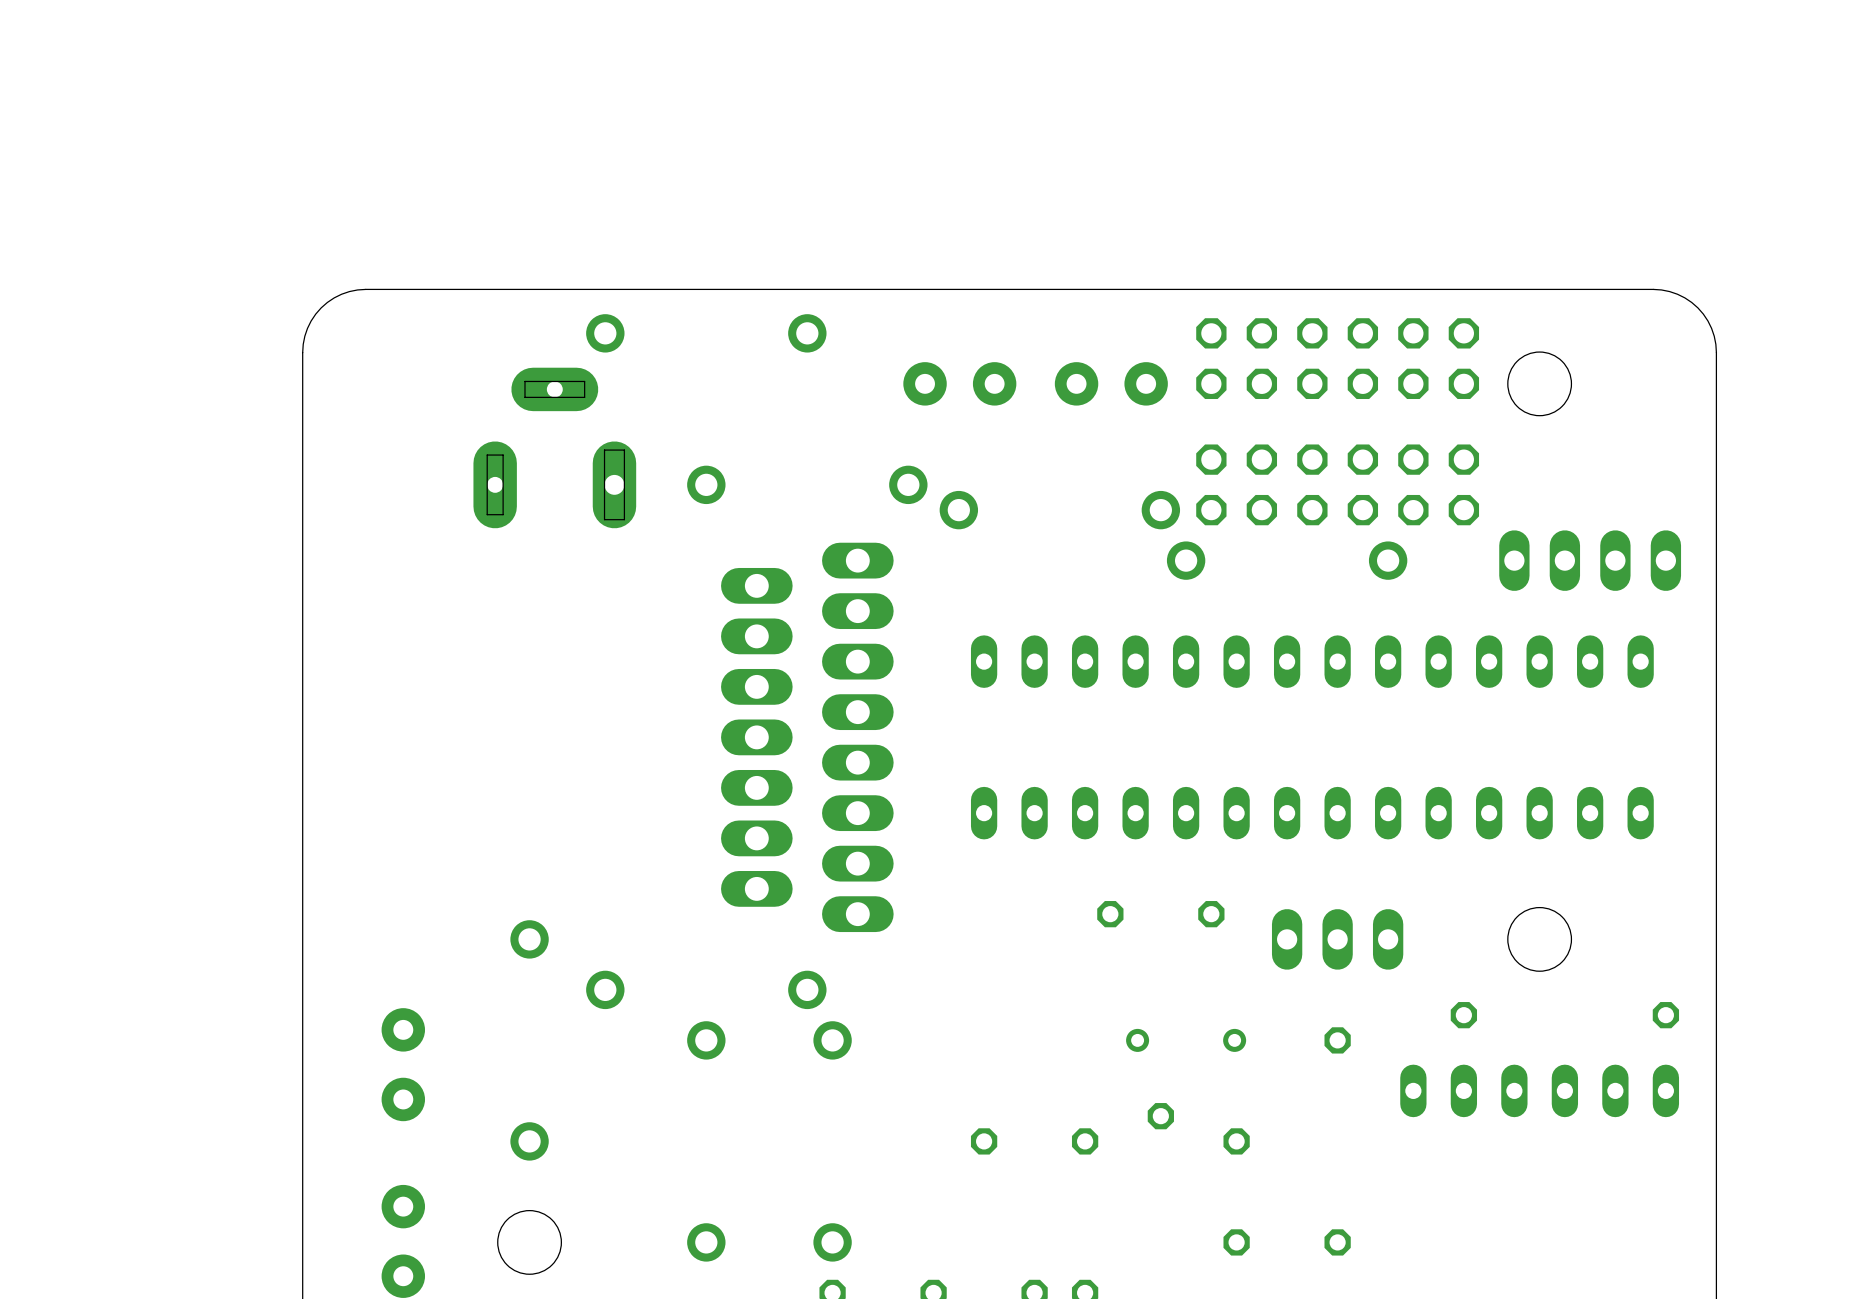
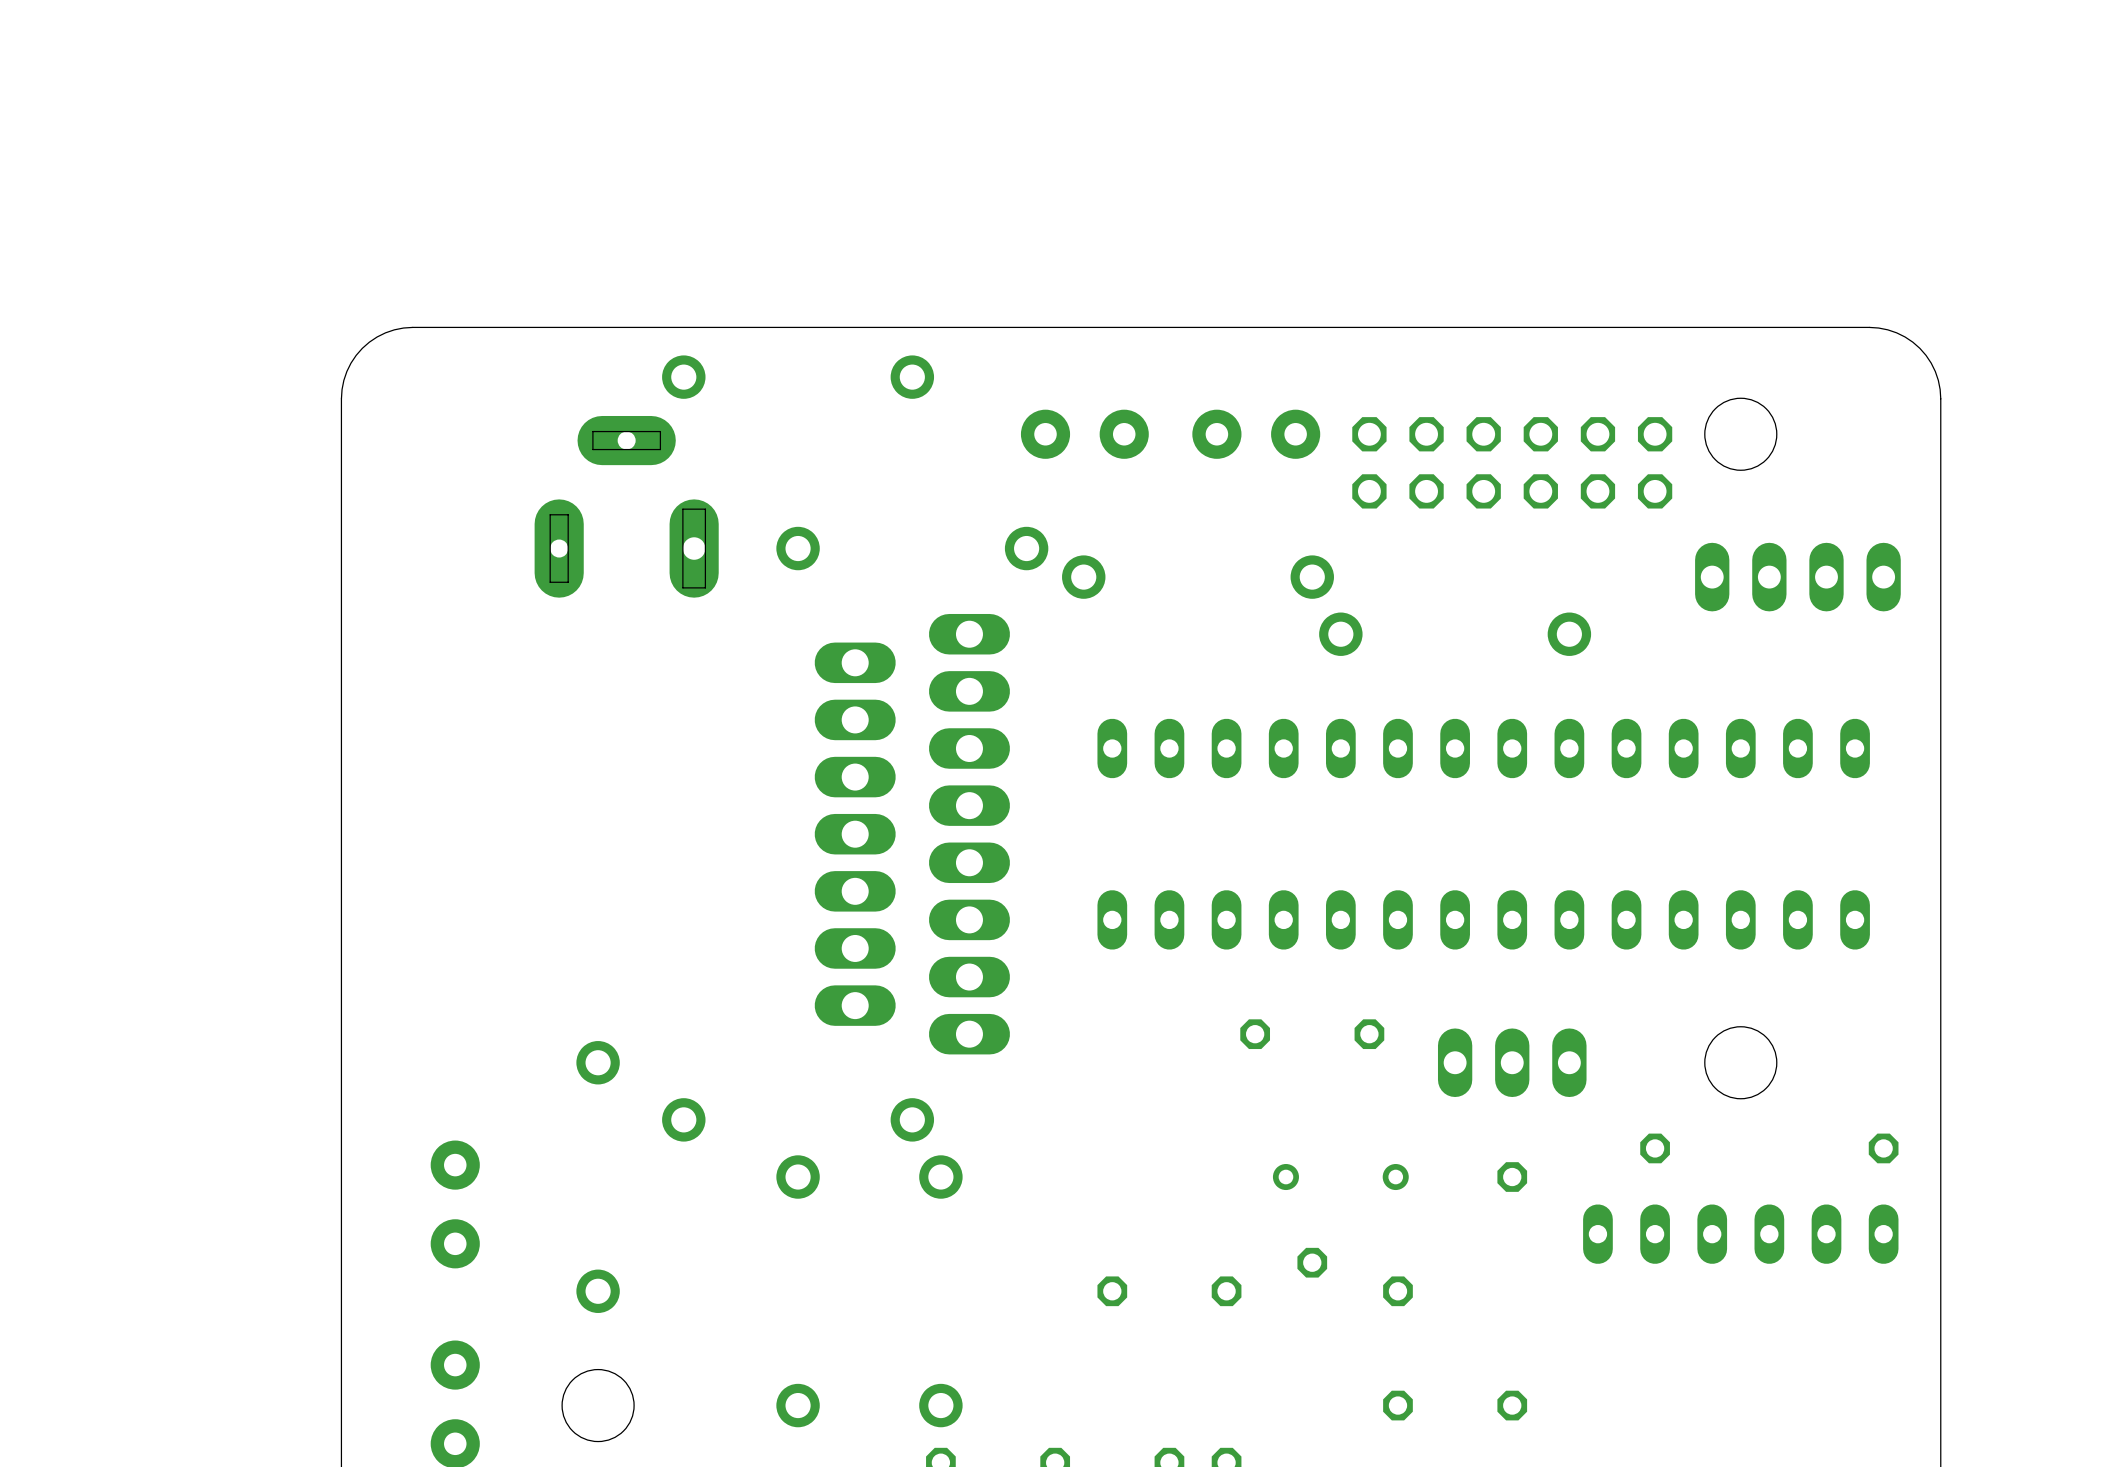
part: (1337, 358) -> none
part: none -> (1512, 462)
part: (1337, 484) -> none
part position: (1590, 560) -> (1797, 577)

